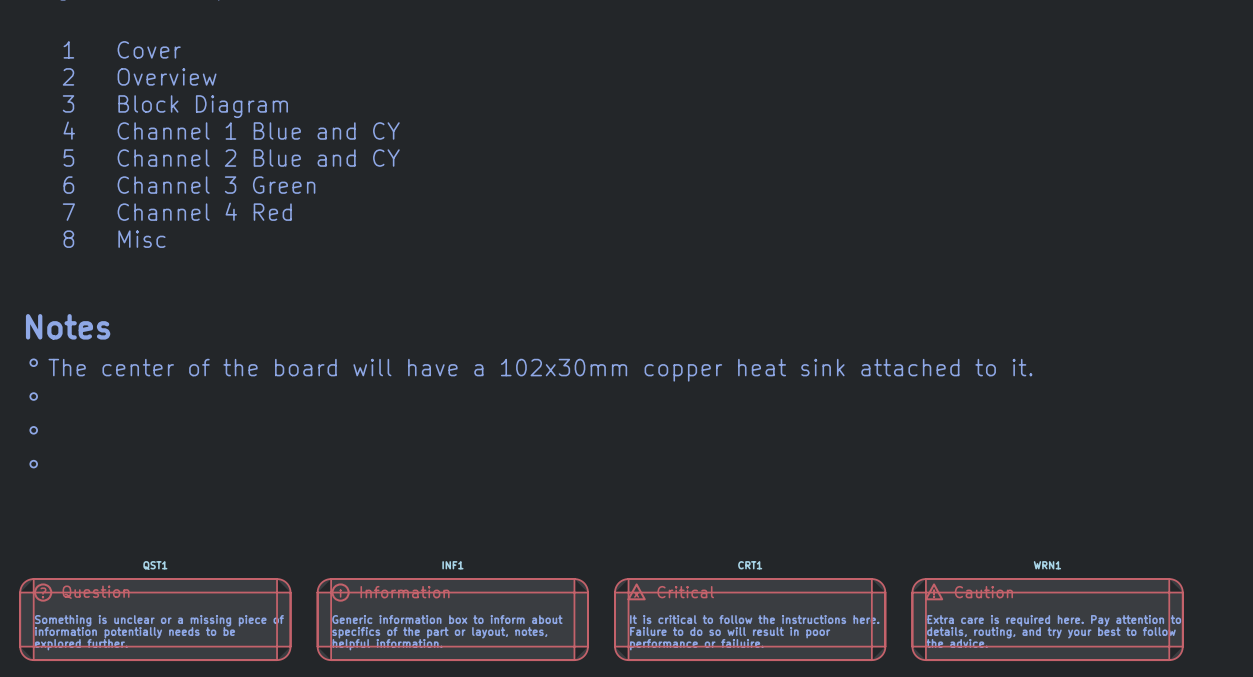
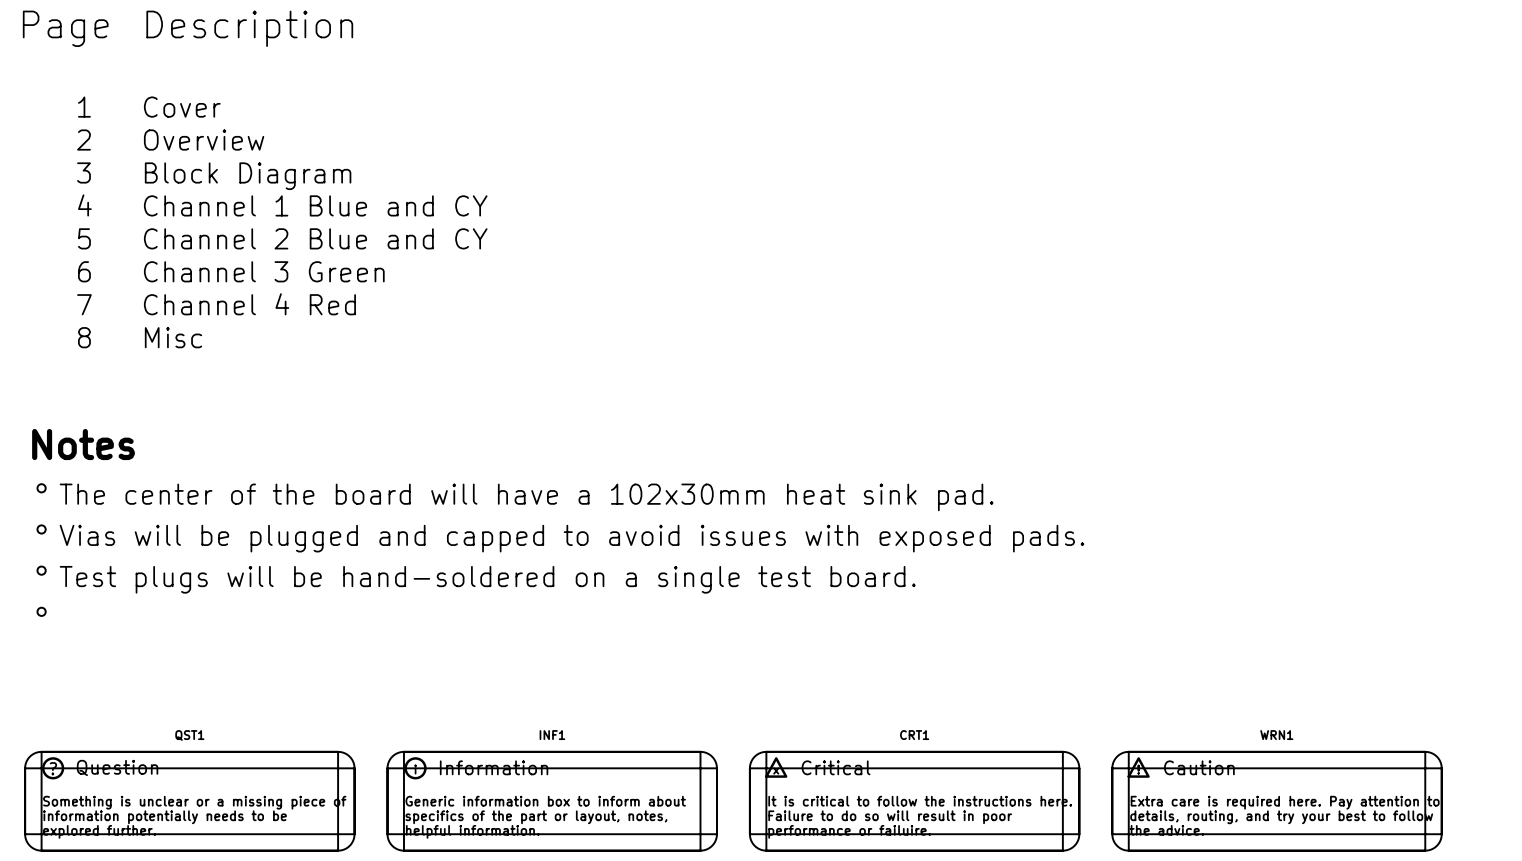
text: The center of the board will have a 102x30mm copper heat sink attached to it. (540, 370) -> The center of the board will have a 102x30mm heat sink pad. (526, 497)
text: none -> Vias will be plugged and capped to avoid issues with exposed pads. (571, 538)
text: none -> Test plugs will be hand-soldered on a single test board. (487, 579)

